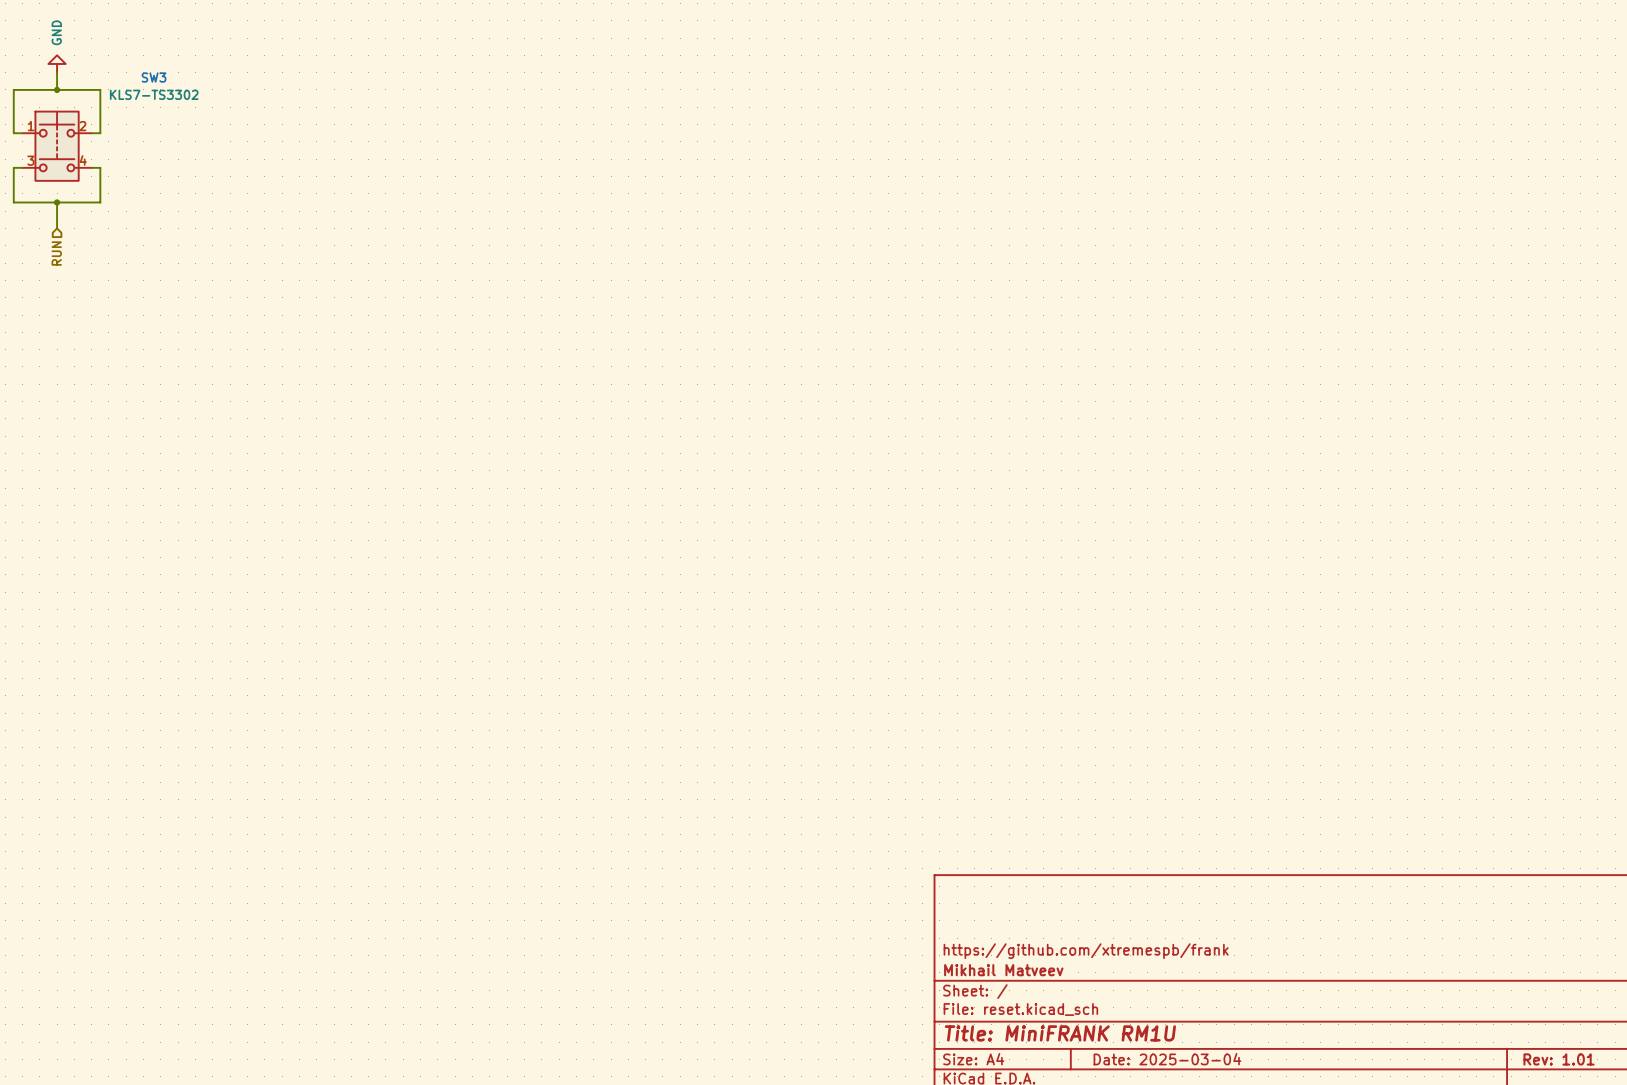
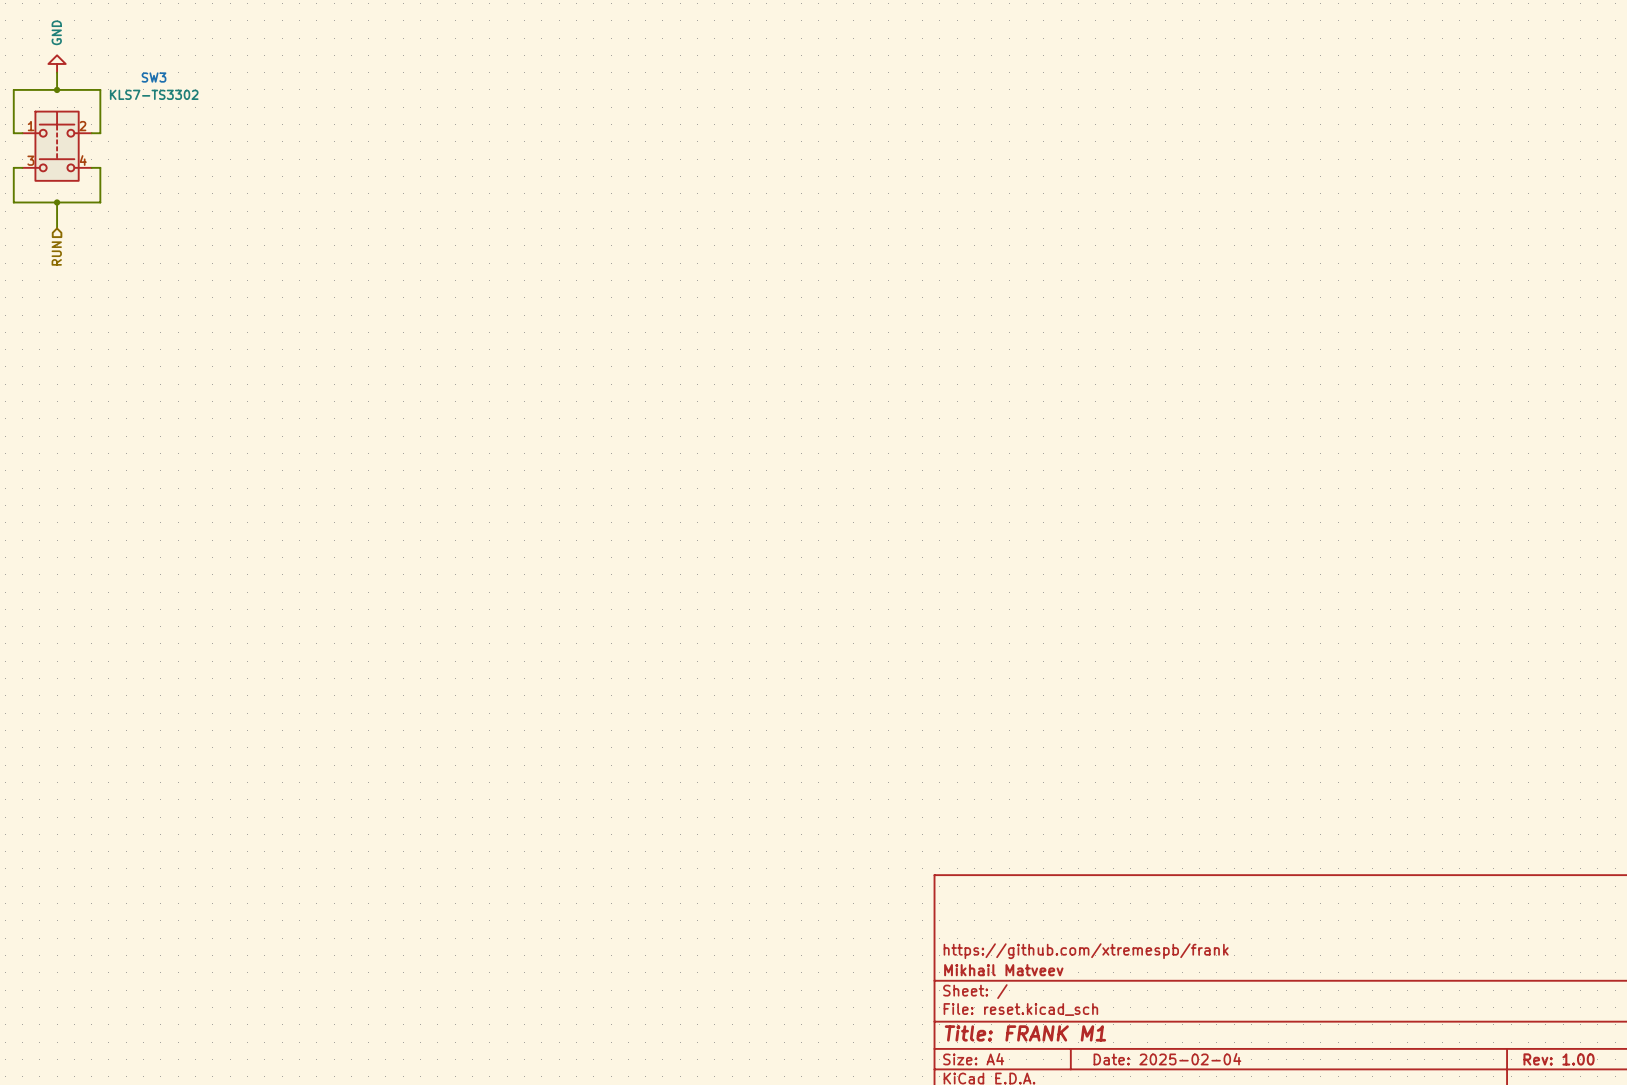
title block: Title: MiniFRANK RM1U (1060, 1033) -> Title: FRANK M1 (1025, 1033)
title block: Date: 2025-03-04 (1167, 1059) -> Date: 2025-02-04 (1167, 1059)
title block: Rev: 1.01 (1559, 1059) -> Rev: 1.00 (1559, 1059)

